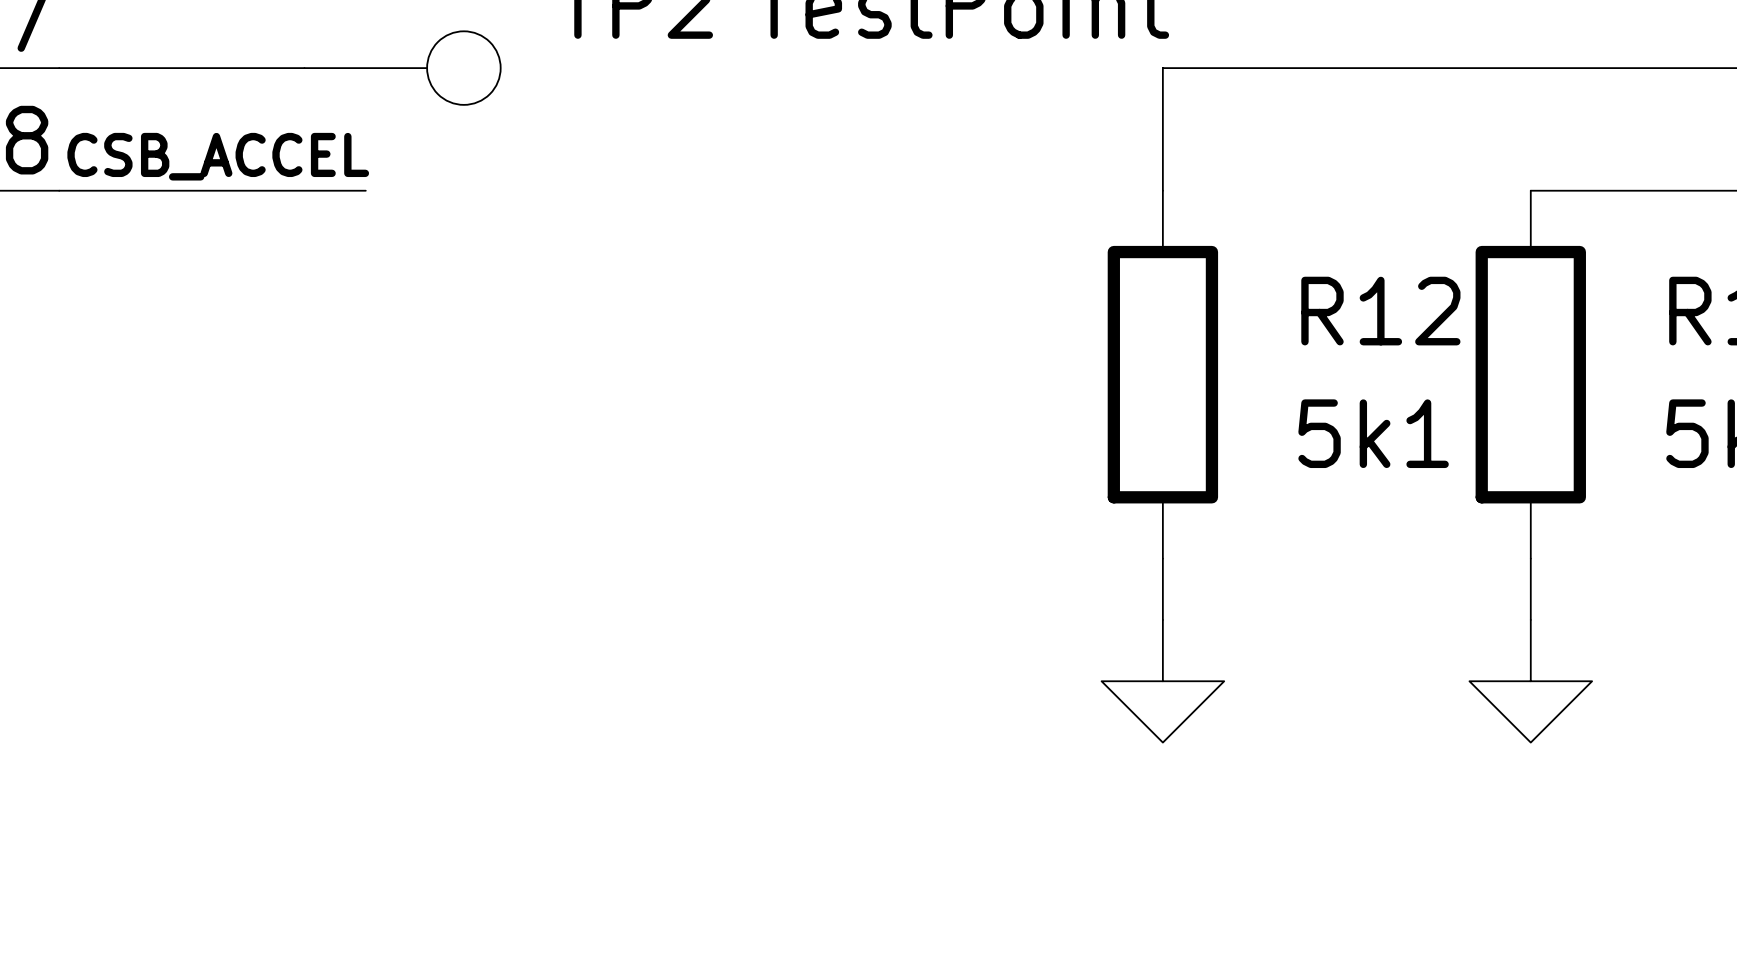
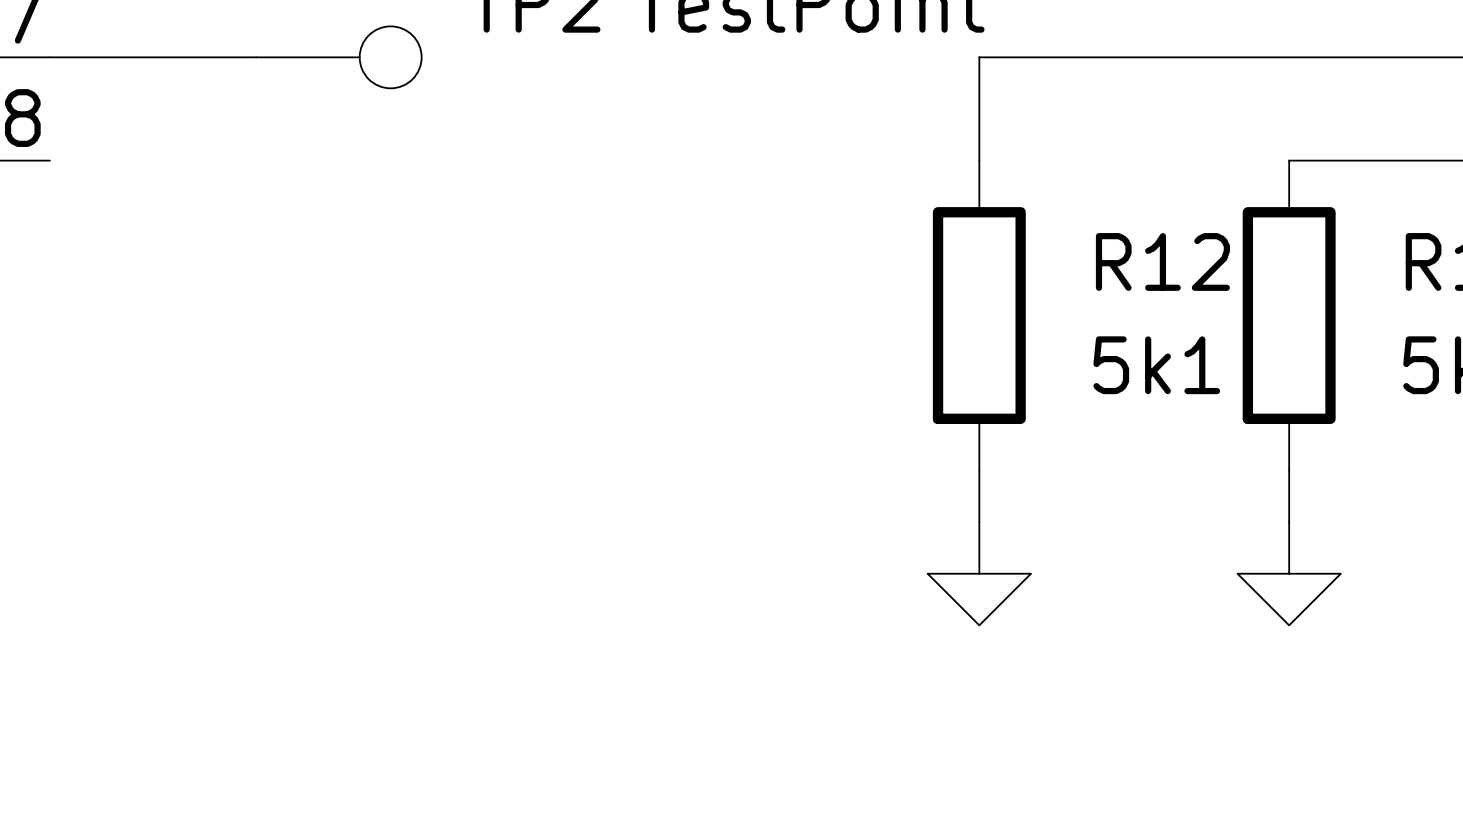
label: CSB_ACCEL (218, 156) -> none
wire: (59, 190) (365, 190) -> none

